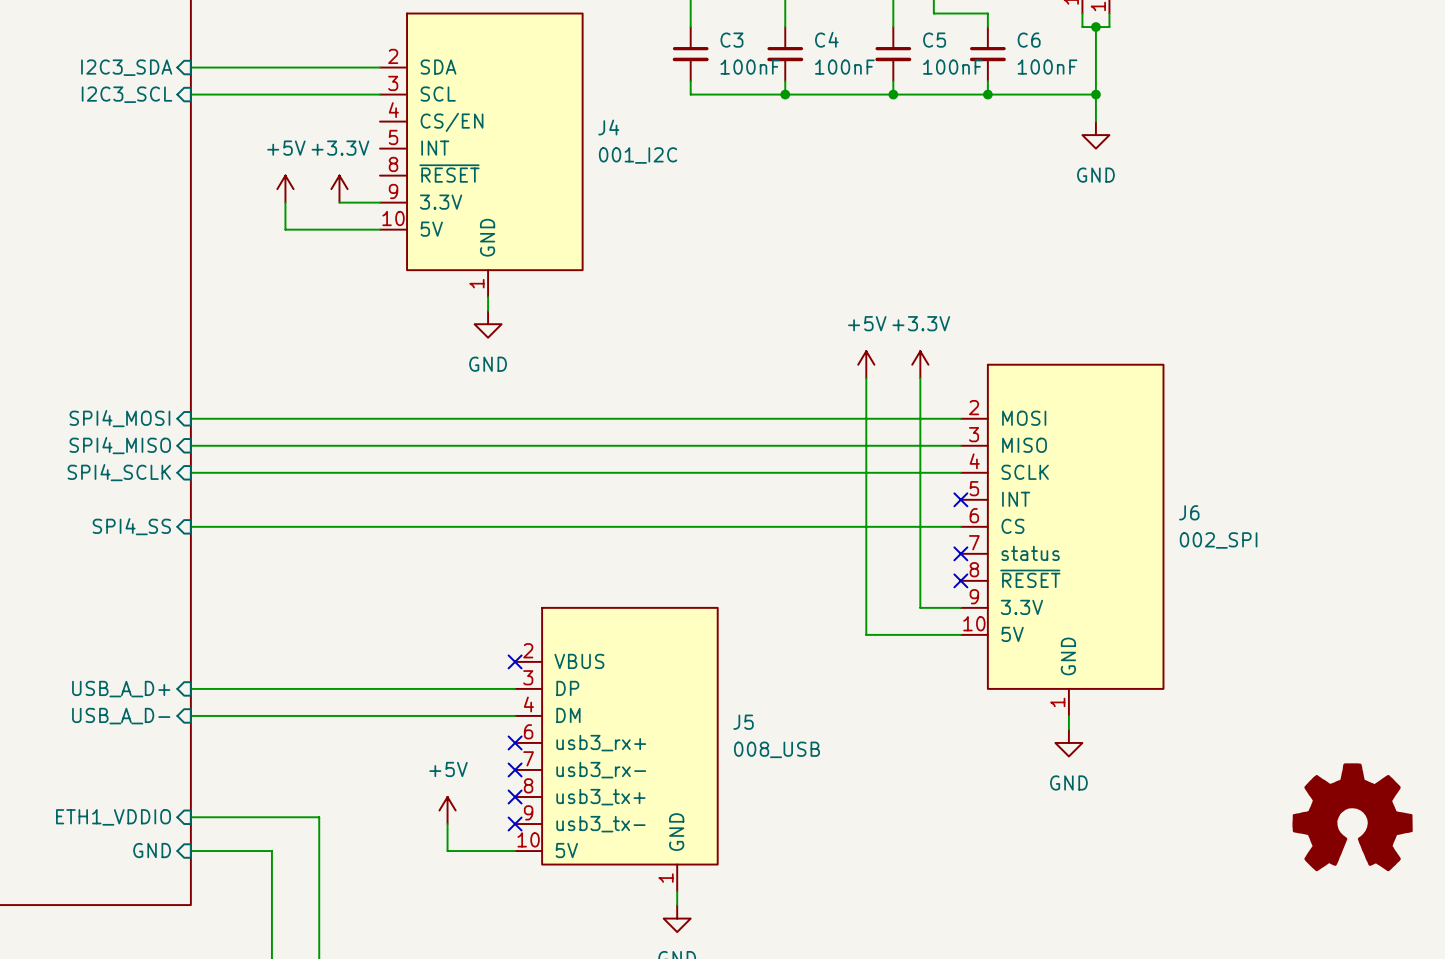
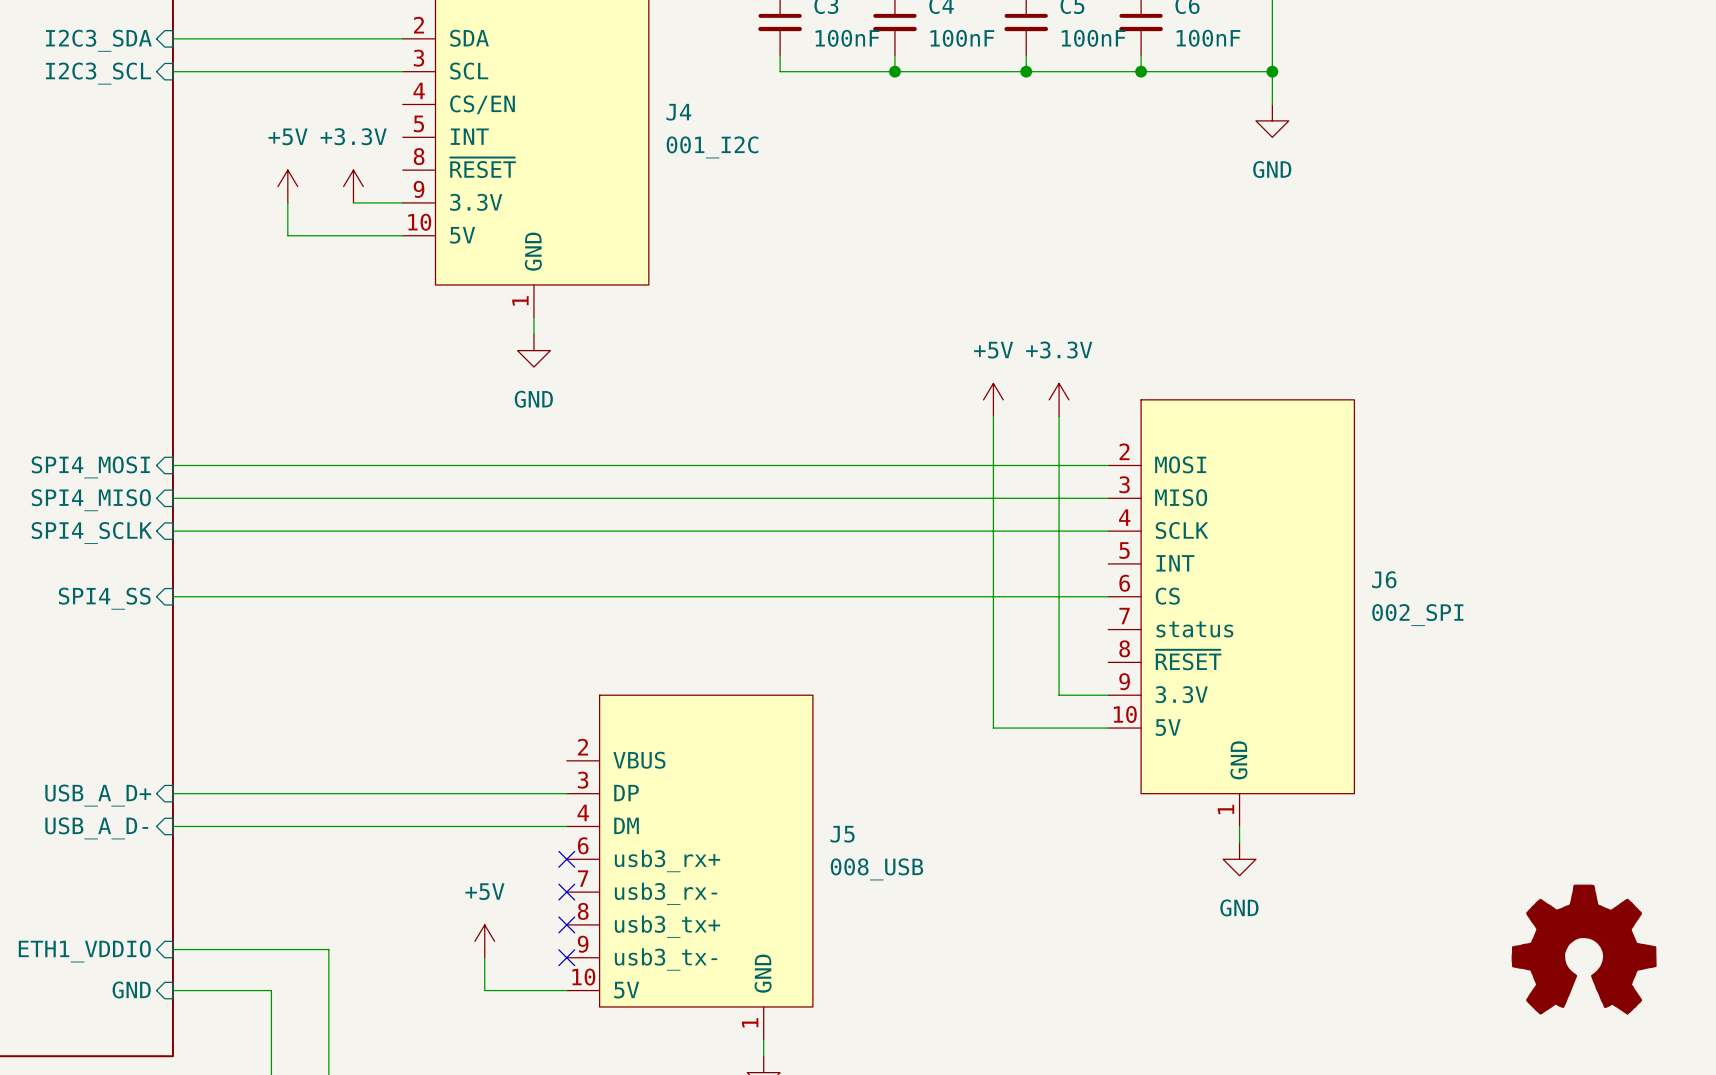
no-connect mark: (960, 499) -> none
no-connect mark: (960, 553) -> none
no-connect mark: (960, 580) -> none
no-connect mark: (515, 661) -> none

